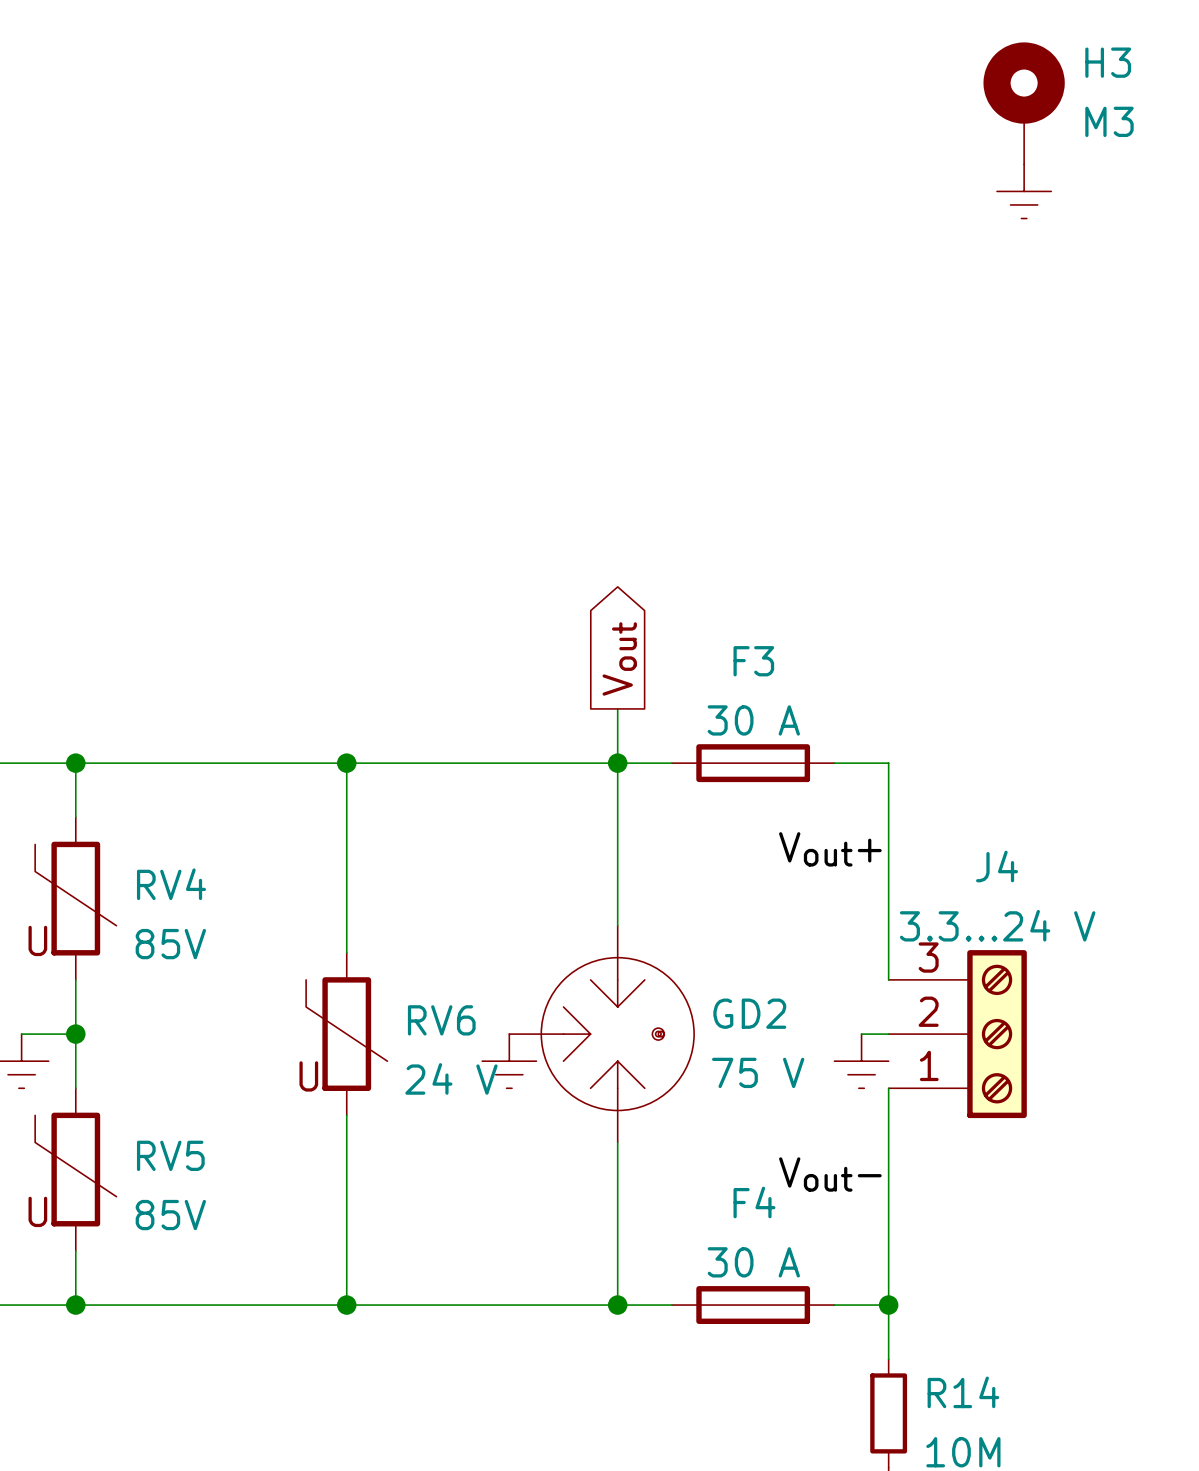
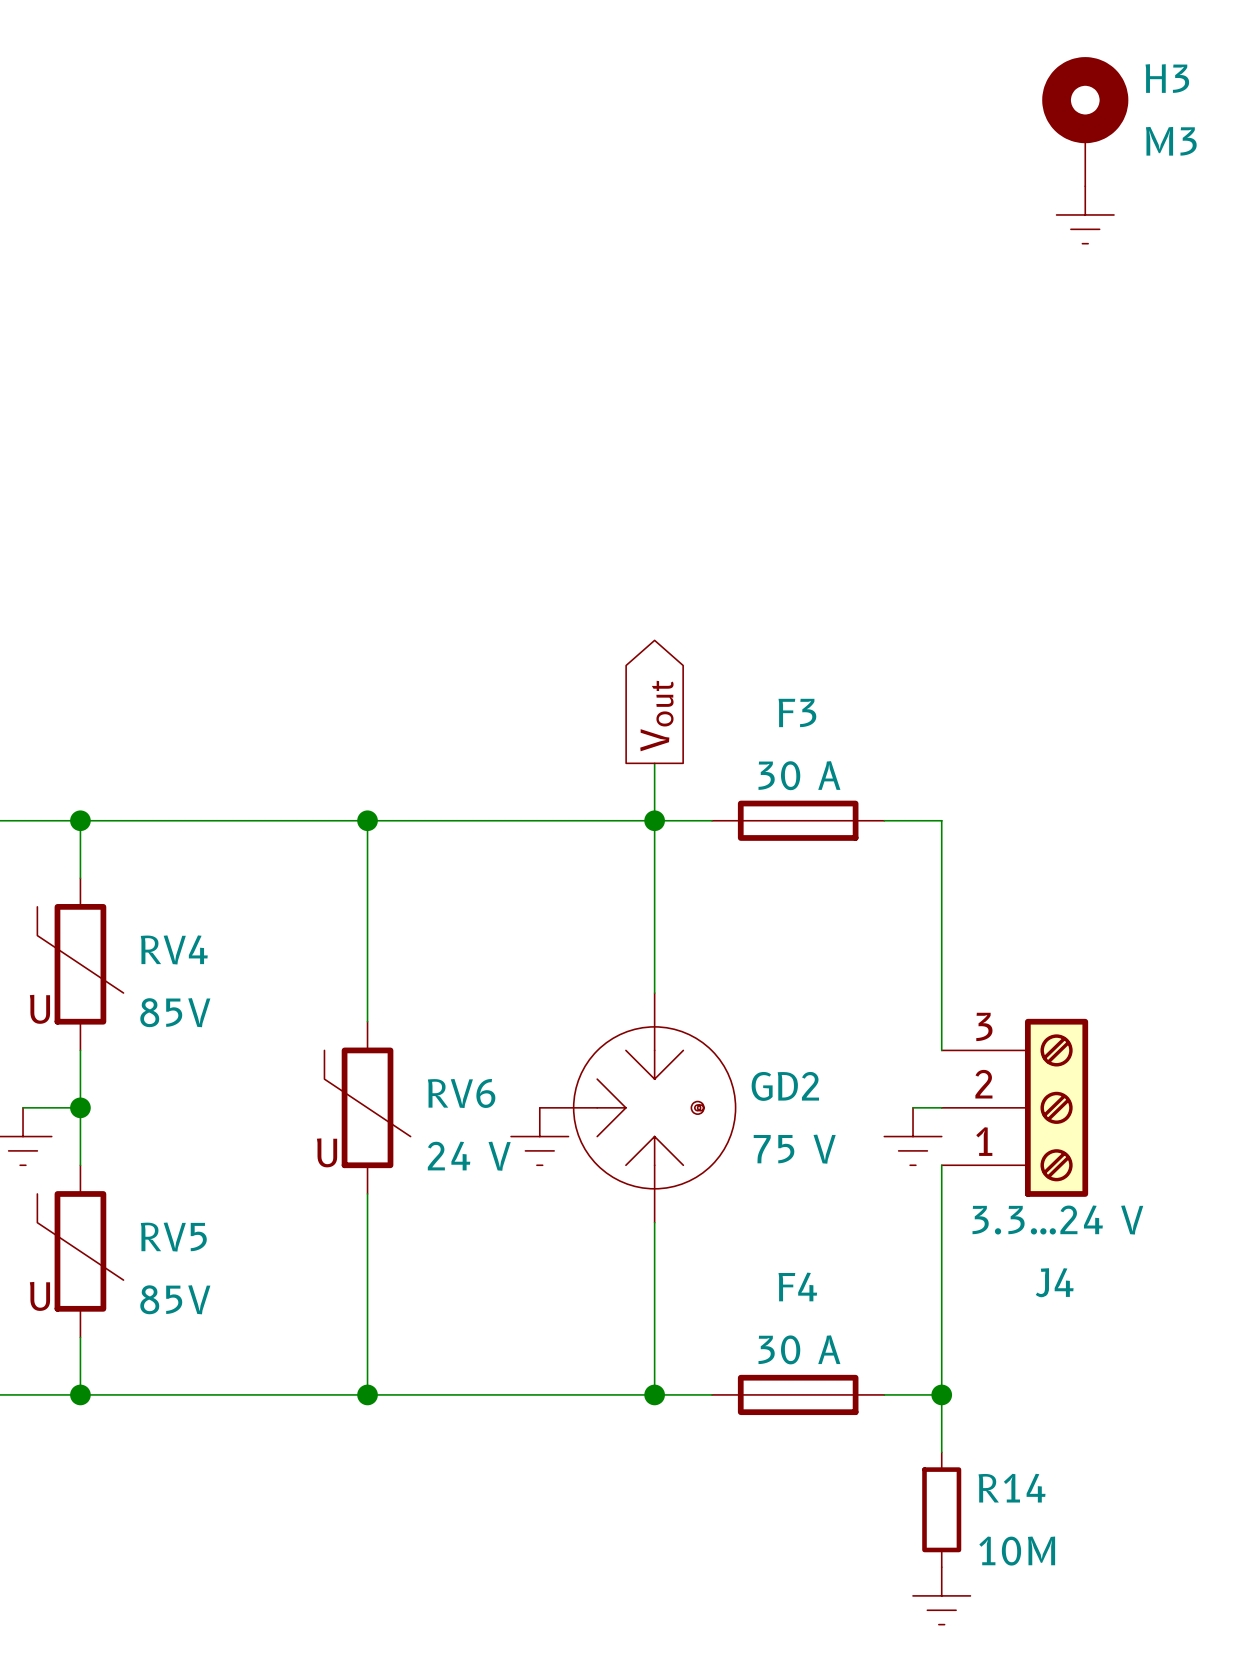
label: Vout+ (830, 849) -> none
J4 name position: J4 (997, 866) -> J4 (1054, 1282)
J4 value position: 3.3…24 V (997, 925) -> 3.3…24 V (1057, 1220)
label: Vout- (830, 1174) -> none

